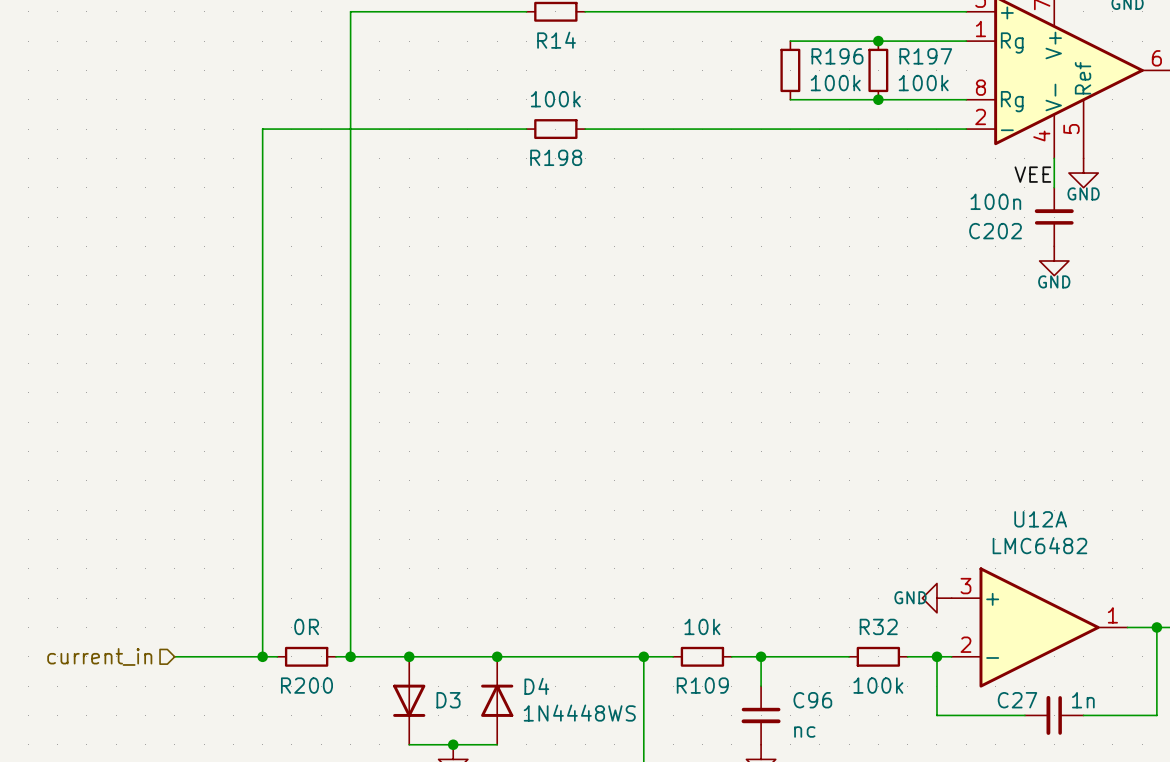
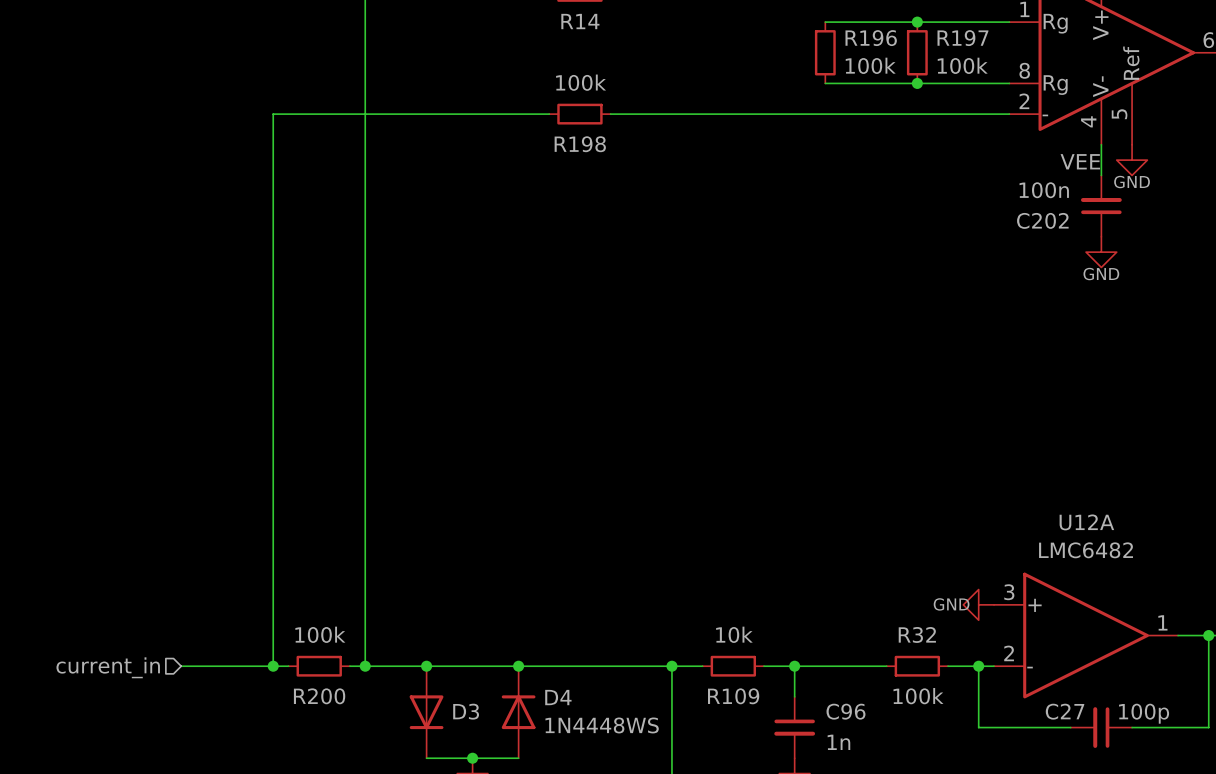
R200 value: 0R (306, 626) -> 100k (320, 634)
C27 value: 1n (1083, 700) -> 100p (1144, 713)
C96 value: nc (804, 731) -> 1n (838, 742)

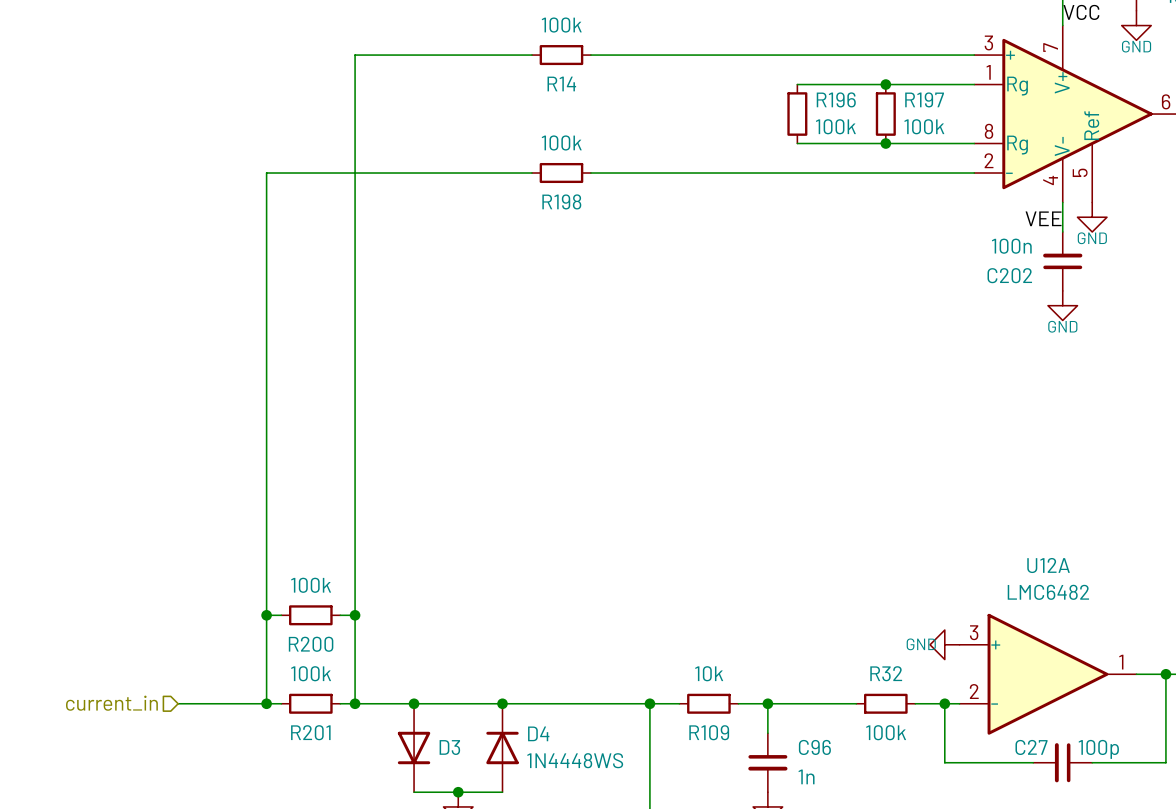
wire: none -> (266, 615) (281, 615)
junction: none -> (266, 615)
R200: none -> 100k (310, 615)
wire: none -> (340, 615) (355, 615)
junction: none -> (355, 615)
R200 name: R200 (319, 696) -> R201 (310, 732)

